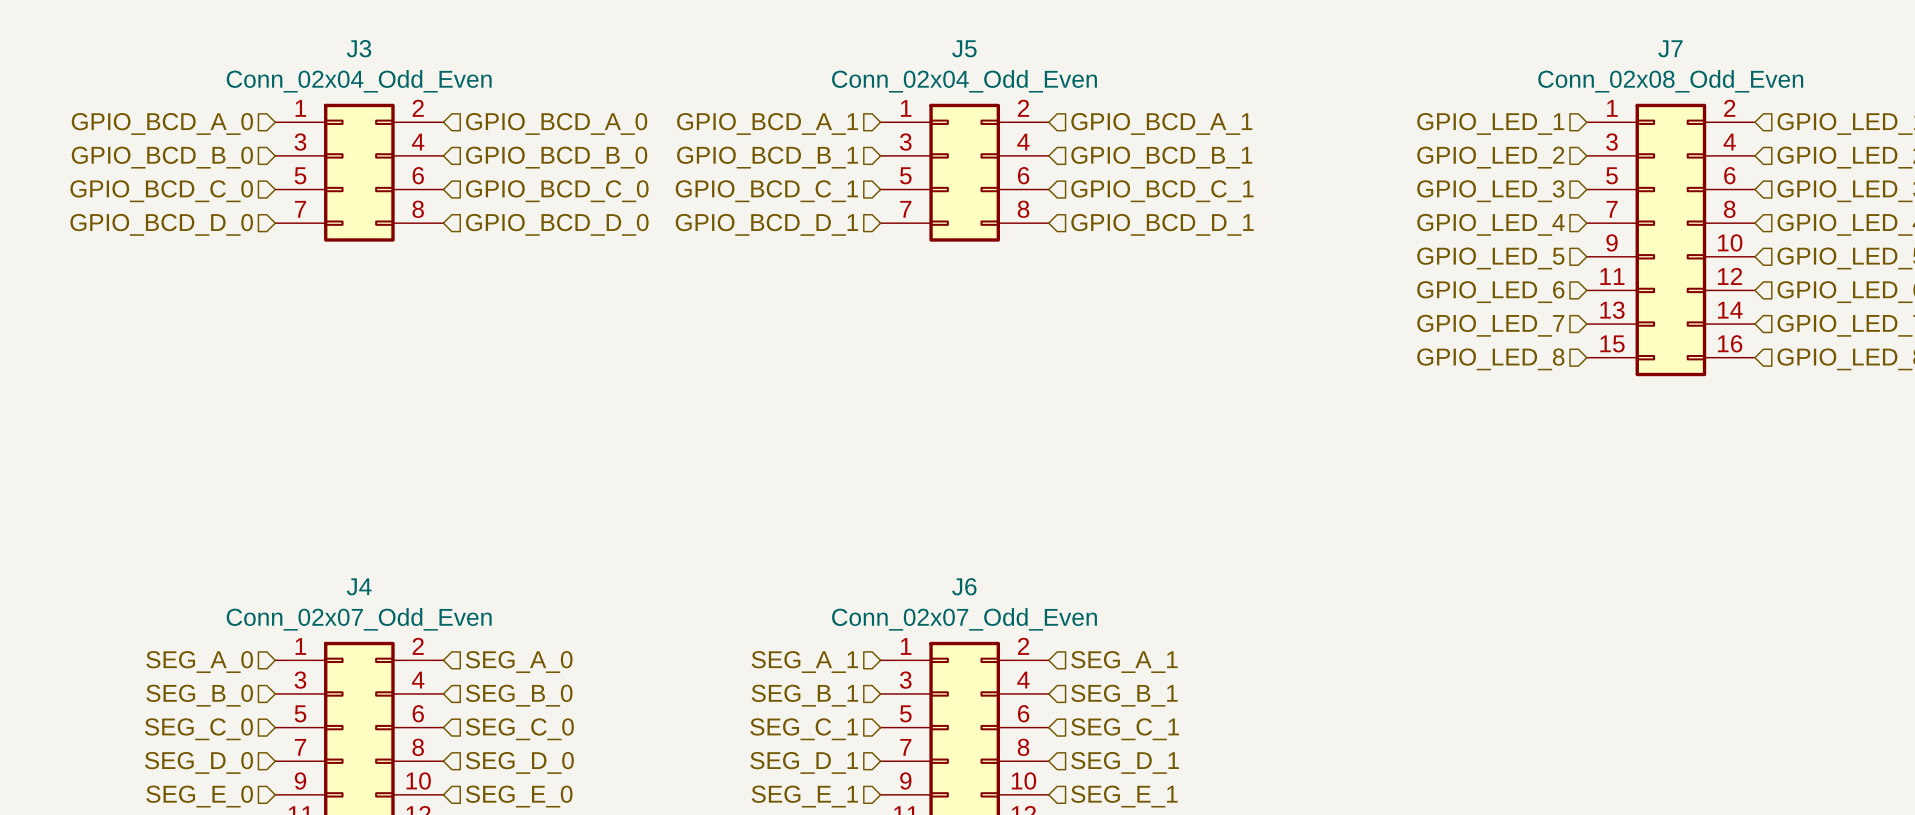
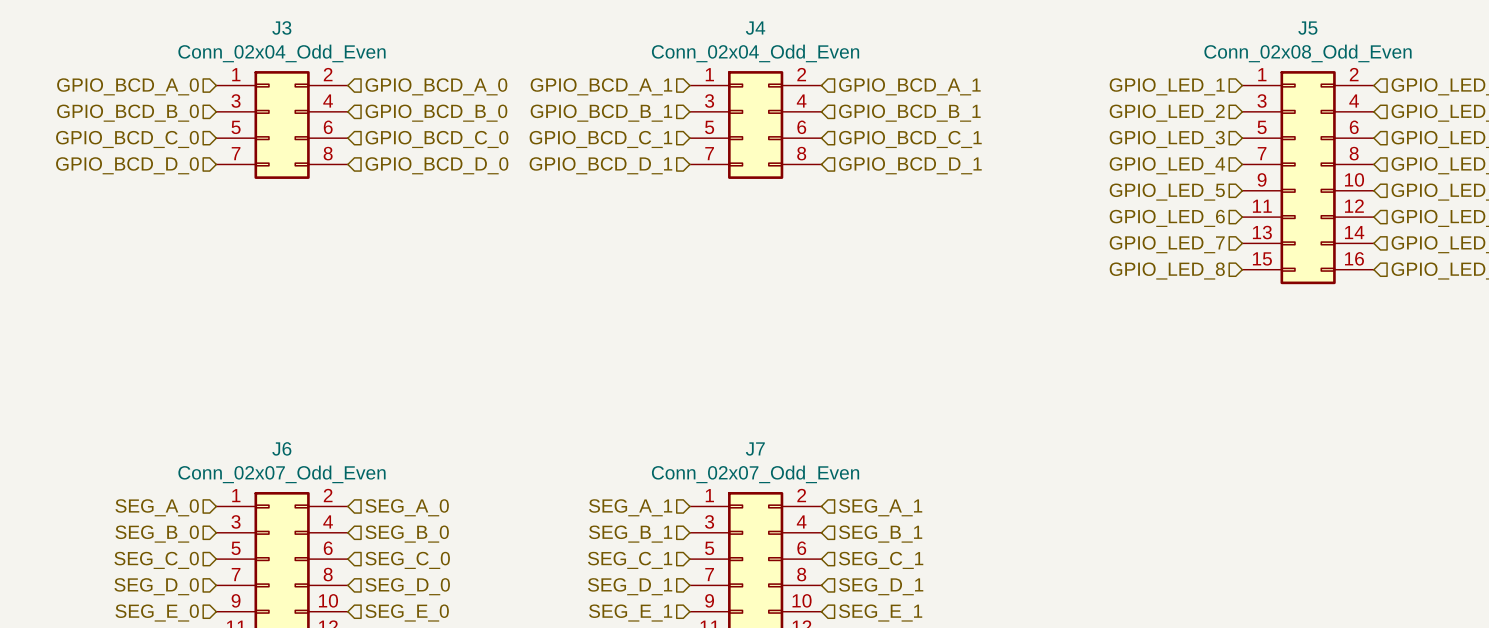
J5 name: J5 (964, 48) -> J4 (755, 28)
J7 name: J7 (1670, 48) -> J5 (1307, 28)
J4 name: J4 (359, 586) -> J6 (281, 448)
J6 name: J6 (964, 586) -> J7 (755, 448)

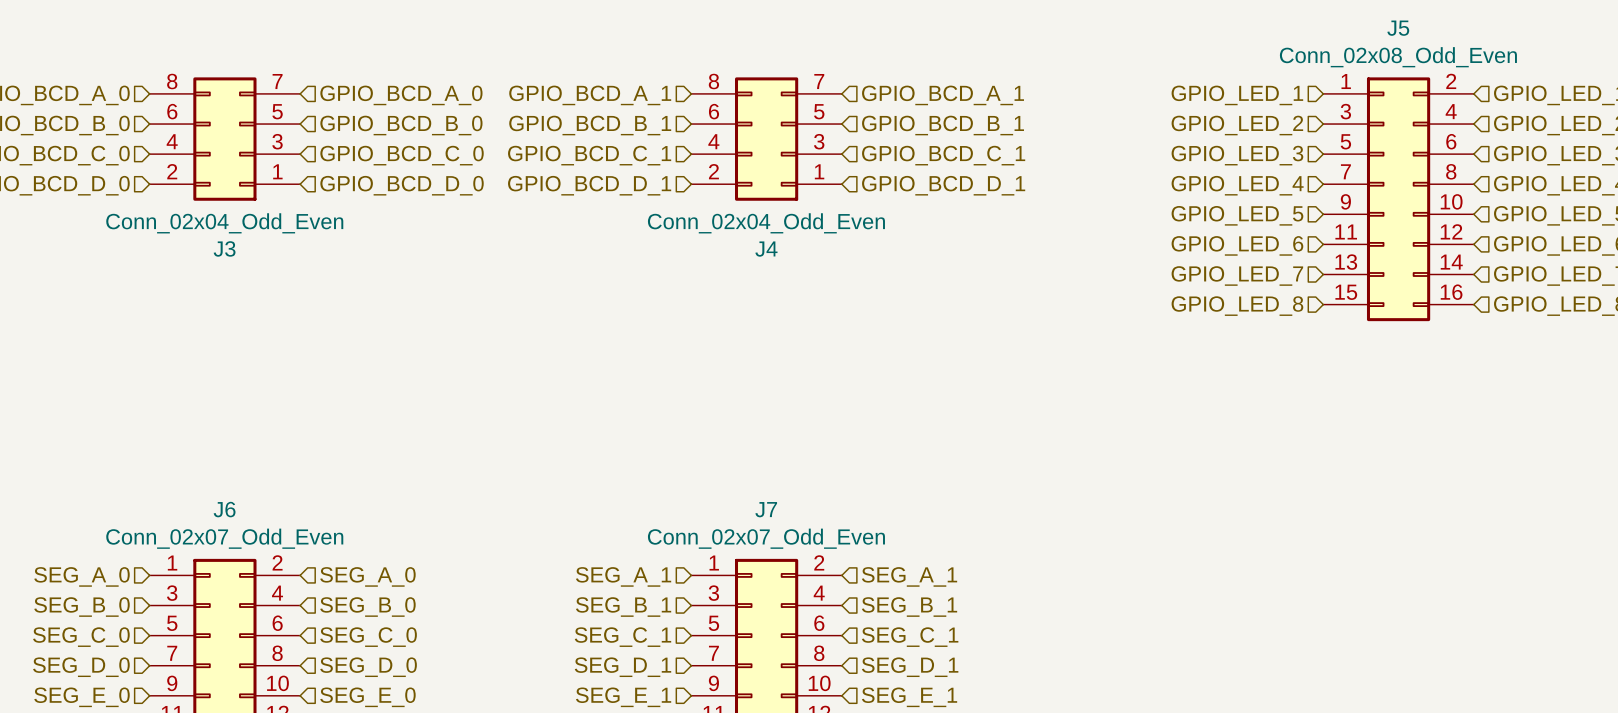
J3 rotation: 0° (282, 125) -> 180° (224, 139)
J4 rotation: 0° (755, 125) -> 180° (766, 139)

